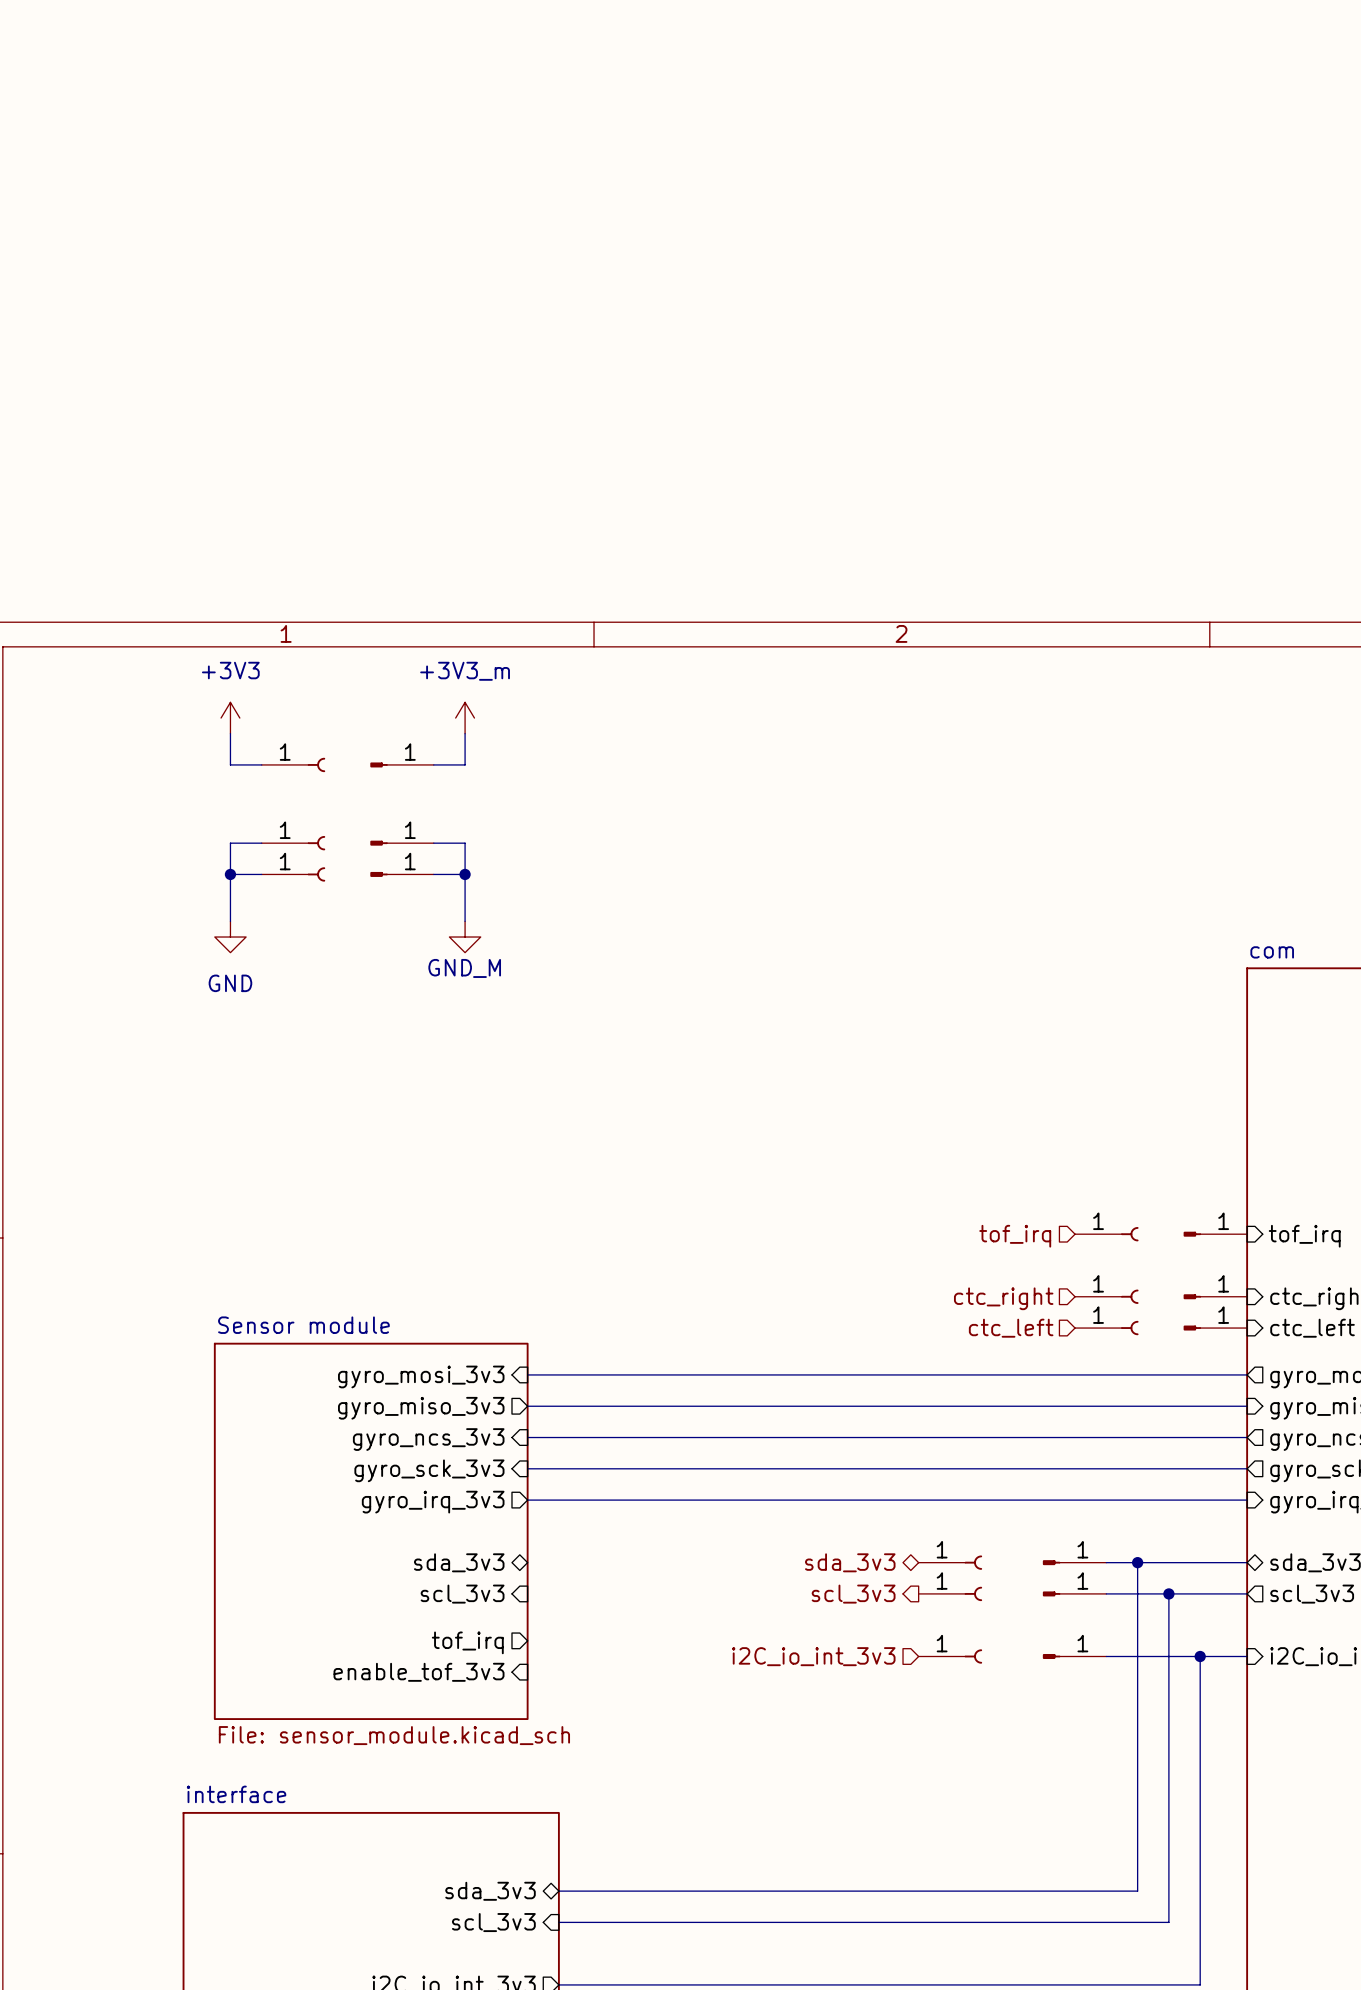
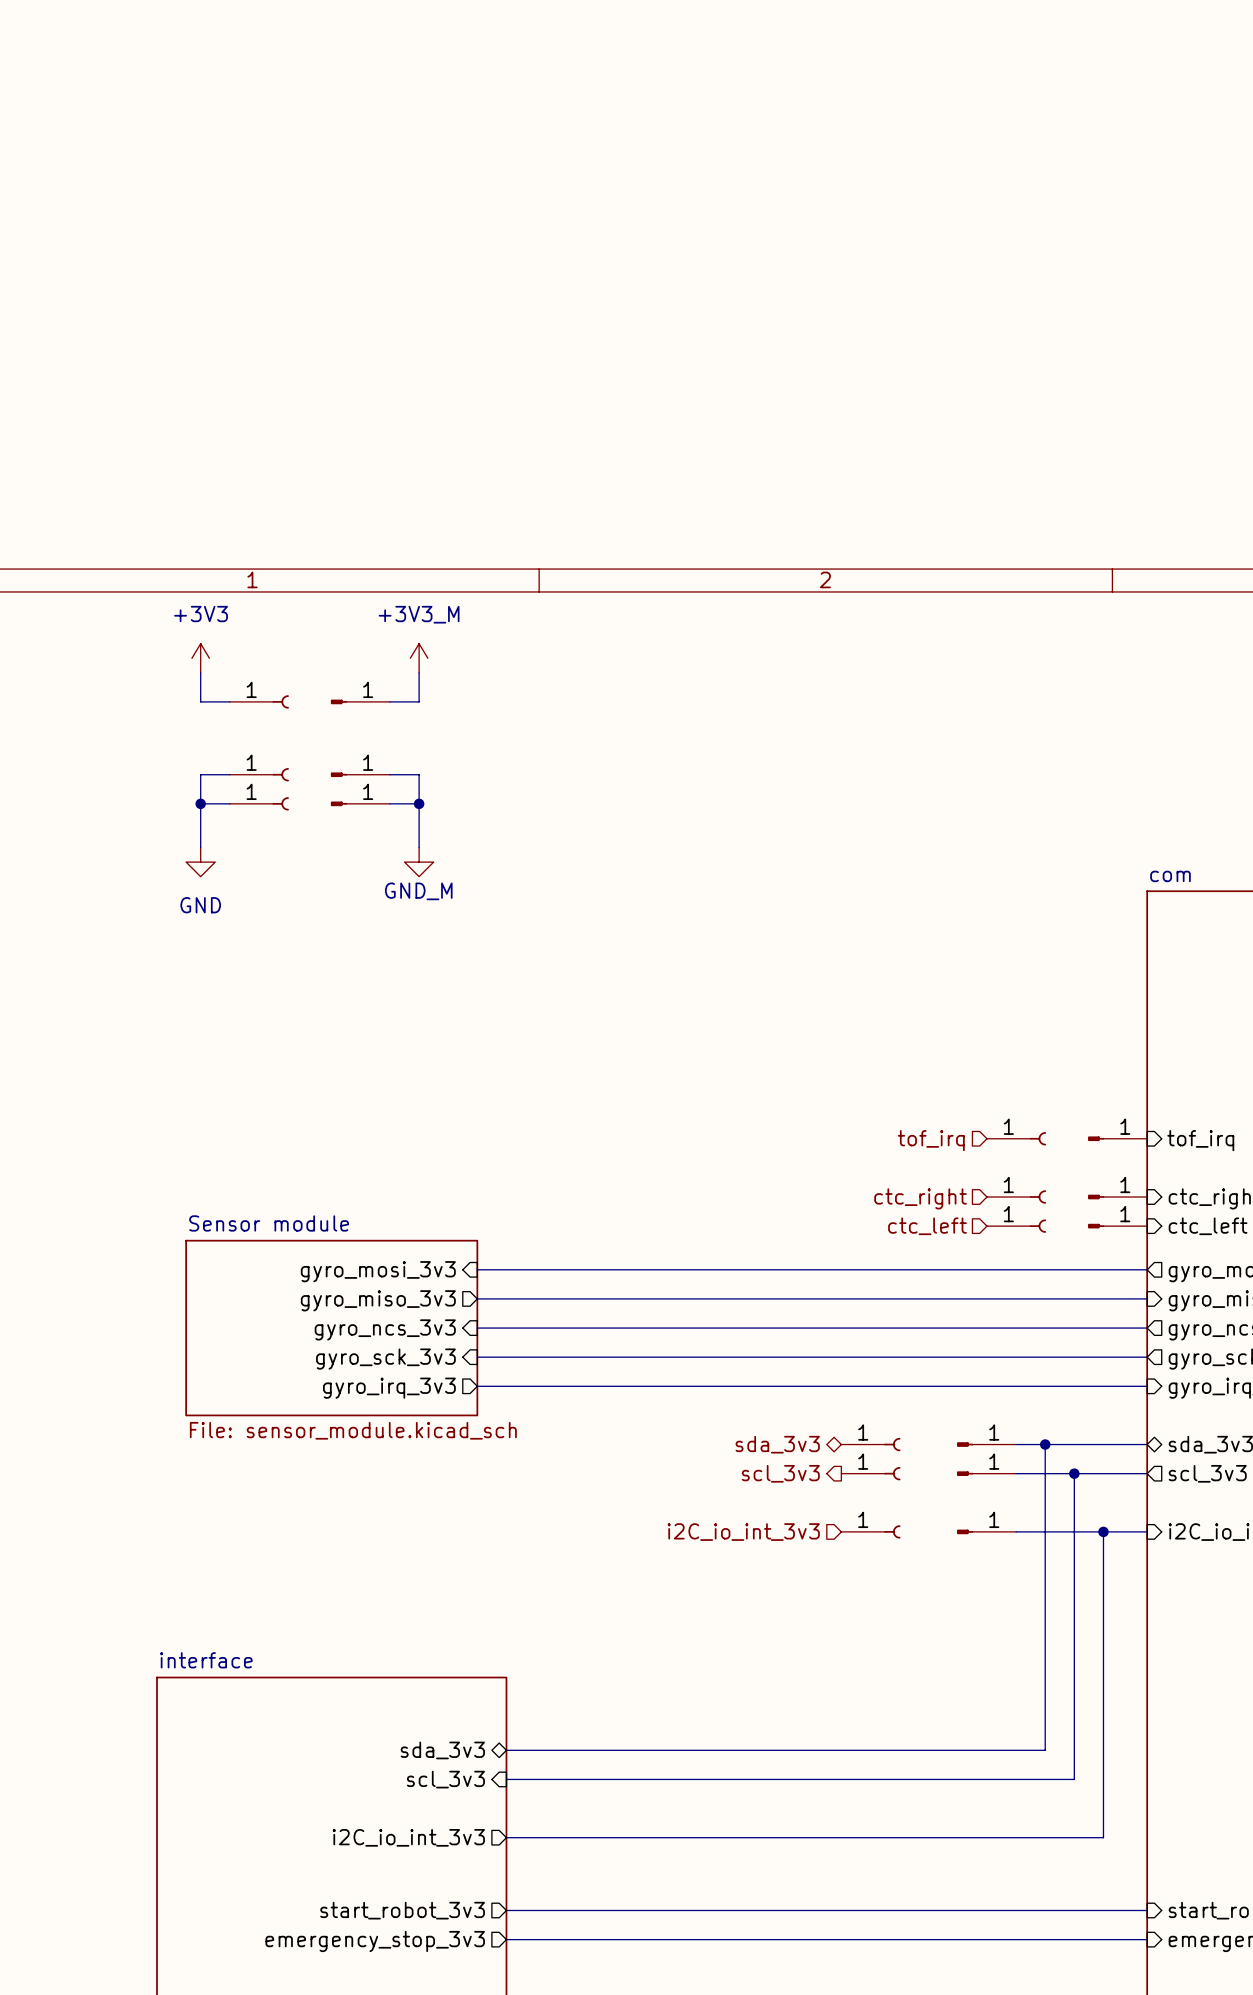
power symbol: +3V3_m (465, 718) -> +3V3_M (419, 658)
sheet Sensor module: none -> File: sensor_module.kicad_sch (331, 1328)
sheet Sensor module: File: sensor_module.kicad_sch (371, 1531) -> none
sheet pin: sda_3v3 (459, 1562) -> none
sheet pin: scl_3v3 (462, 1594) -> none
sheet pin: tof_irq (467, 1642) -> none
sheet pin: enable_tof_3v3 (419, 1672) -> none

